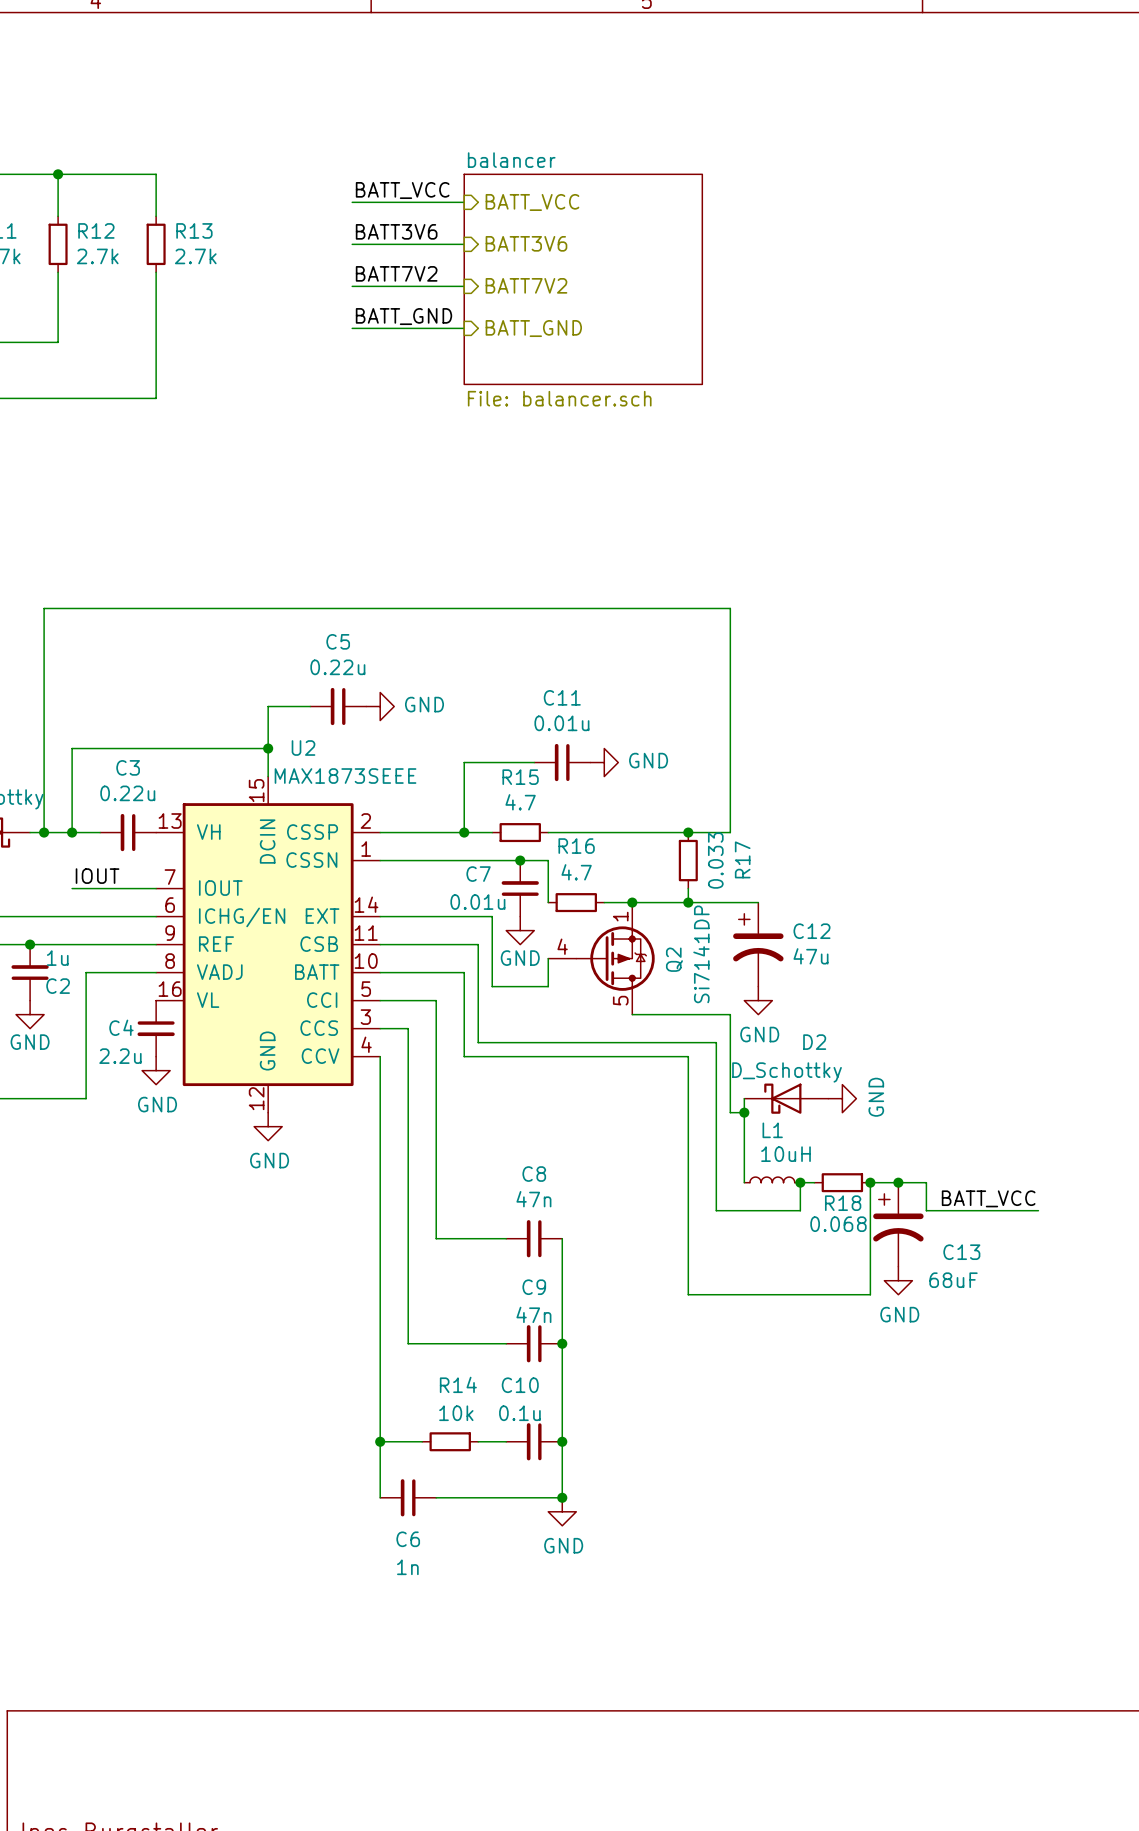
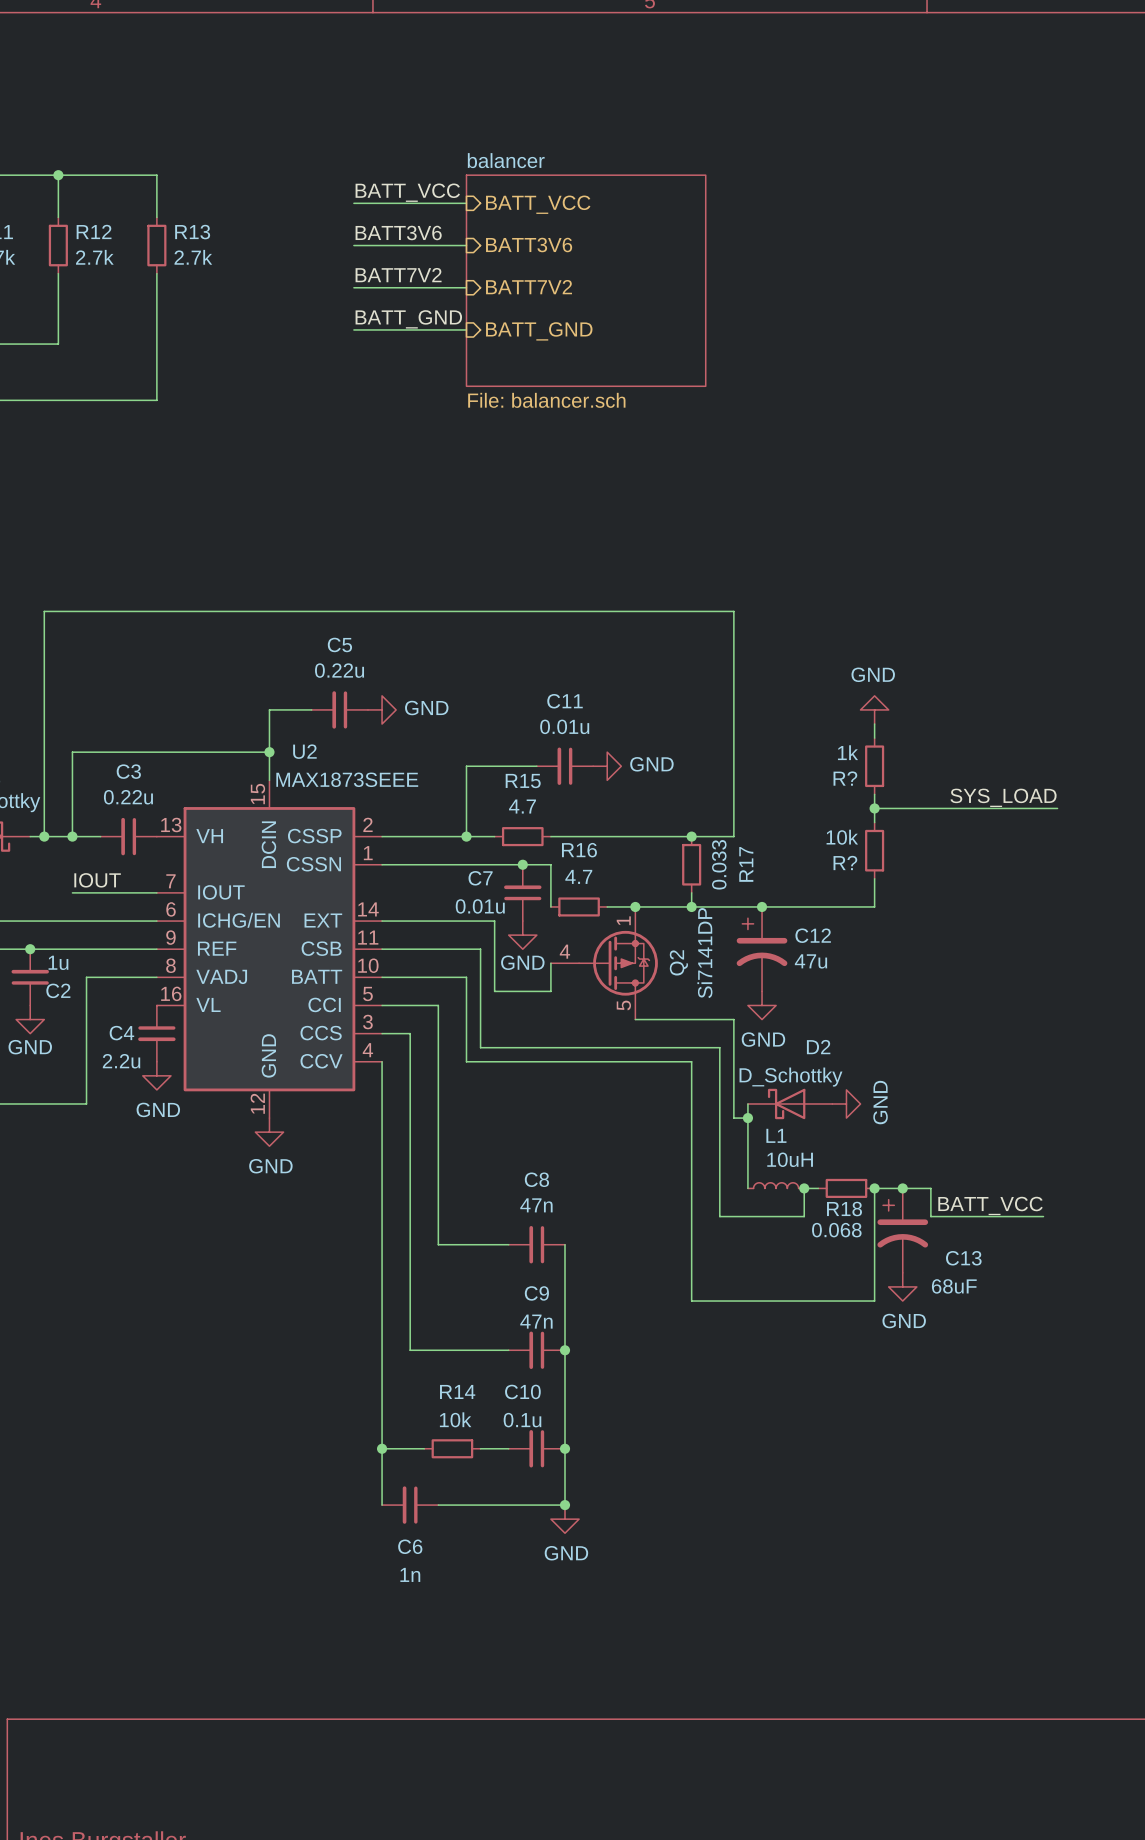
power symbol: none -> GND (874, 709)
wire: none -> (874, 724) (874, 738)
R?: none -> 1k (874, 766)
wire: none -> (874, 794) (874, 822)
label: none -> SYS_LOAD (1003, 797)
wire: none -> (874, 808) (1057, 808)
junction: none -> (874, 808)
R?: none -> 10k (874, 850)
wire: none -> (874, 878) (874, 906) (762, 906)
junction: none -> (762, 906)

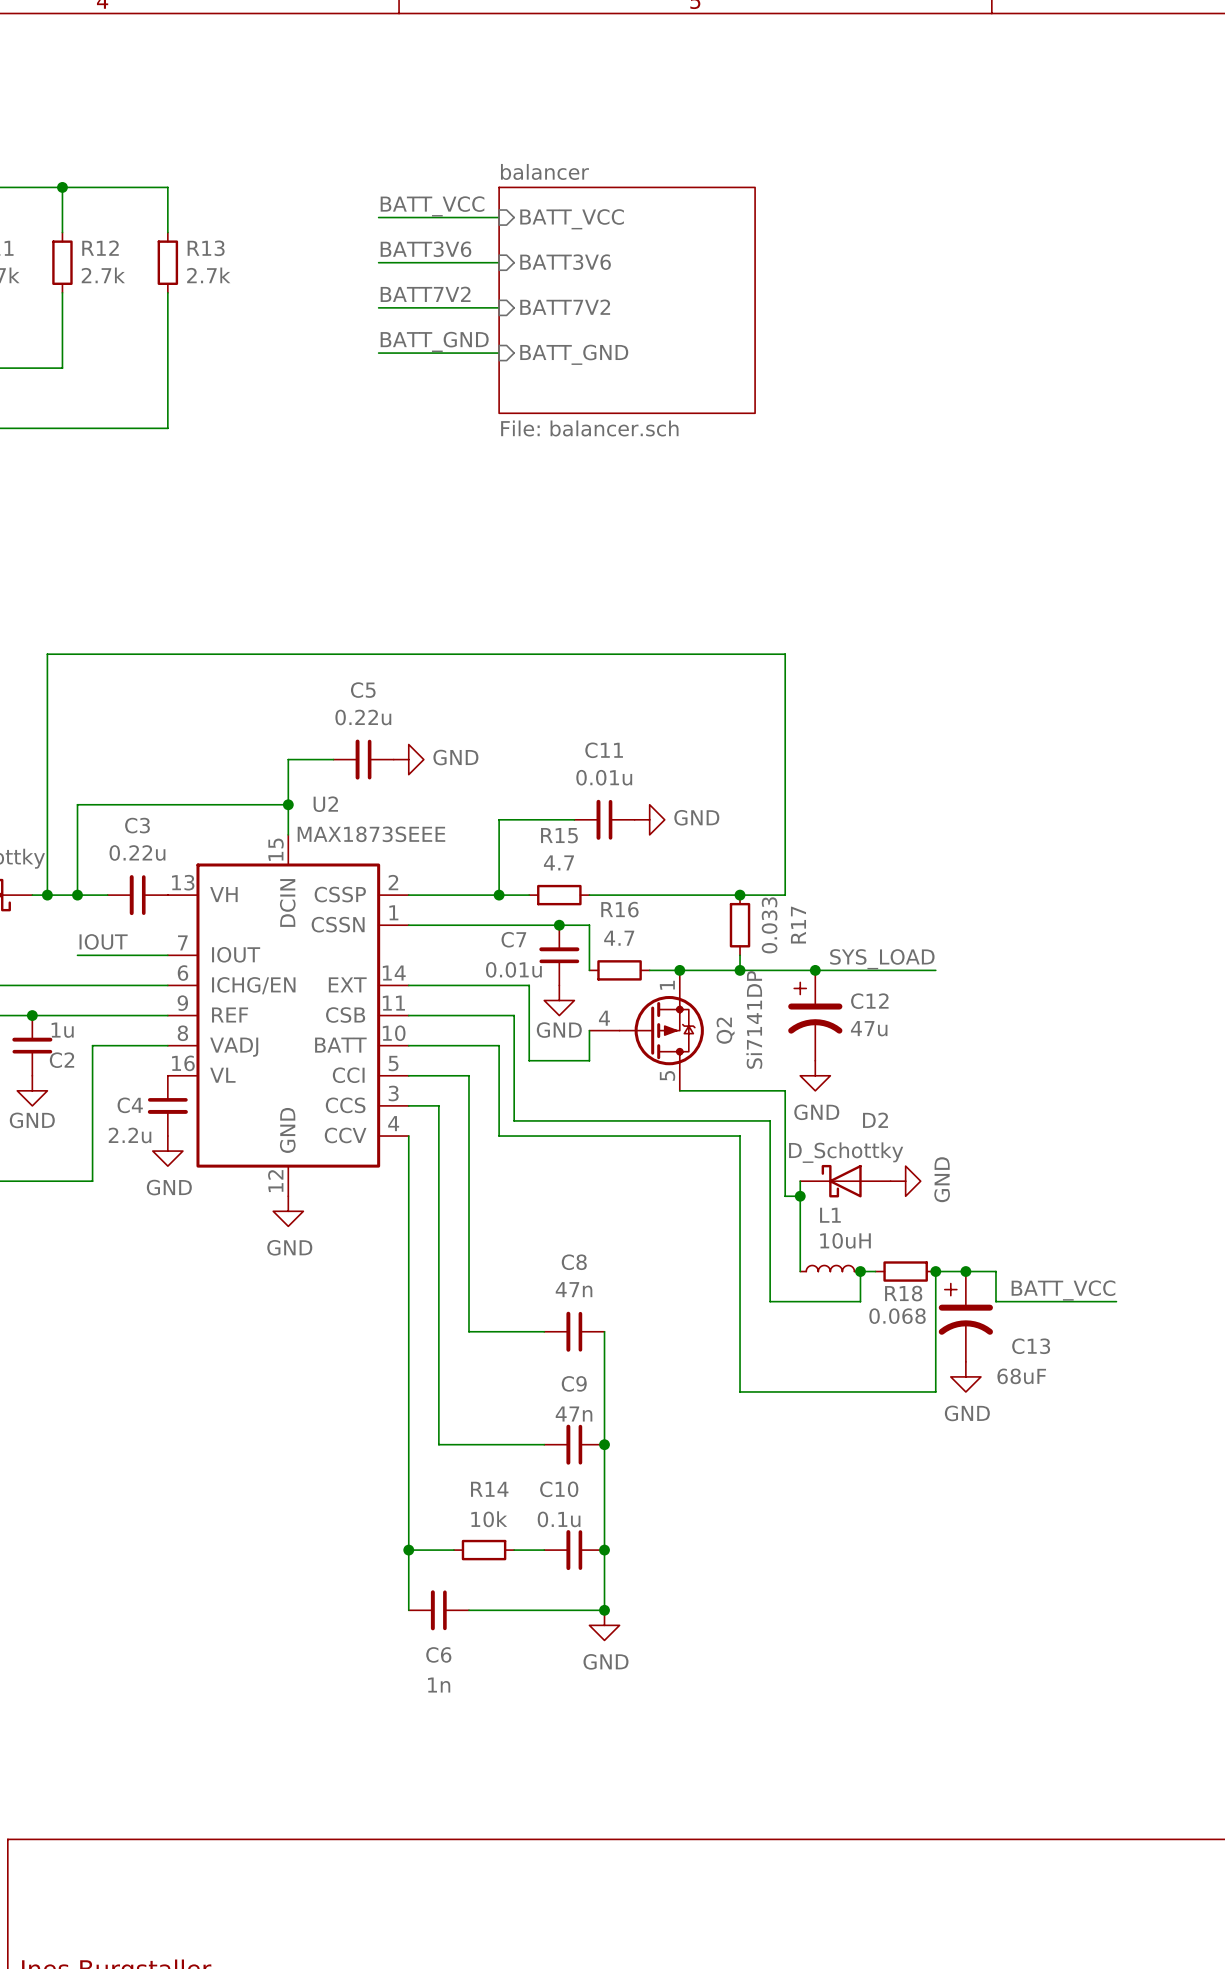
power symbol: GND (874, 709) -> none
wire: (874, 724) (874, 738) -> none
R?: 1k (874, 766) -> none
wire: (874, 794) (874, 822) -> none
label position: SYS_LOAD (1003, 797) -> SYS_LOAD (882, 959)
wire: (874, 808) (1057, 808) -> none
junction: (874, 808) -> none
R?: 10k (874, 850) -> none
wire: (874, 878) (874, 906) -> none

